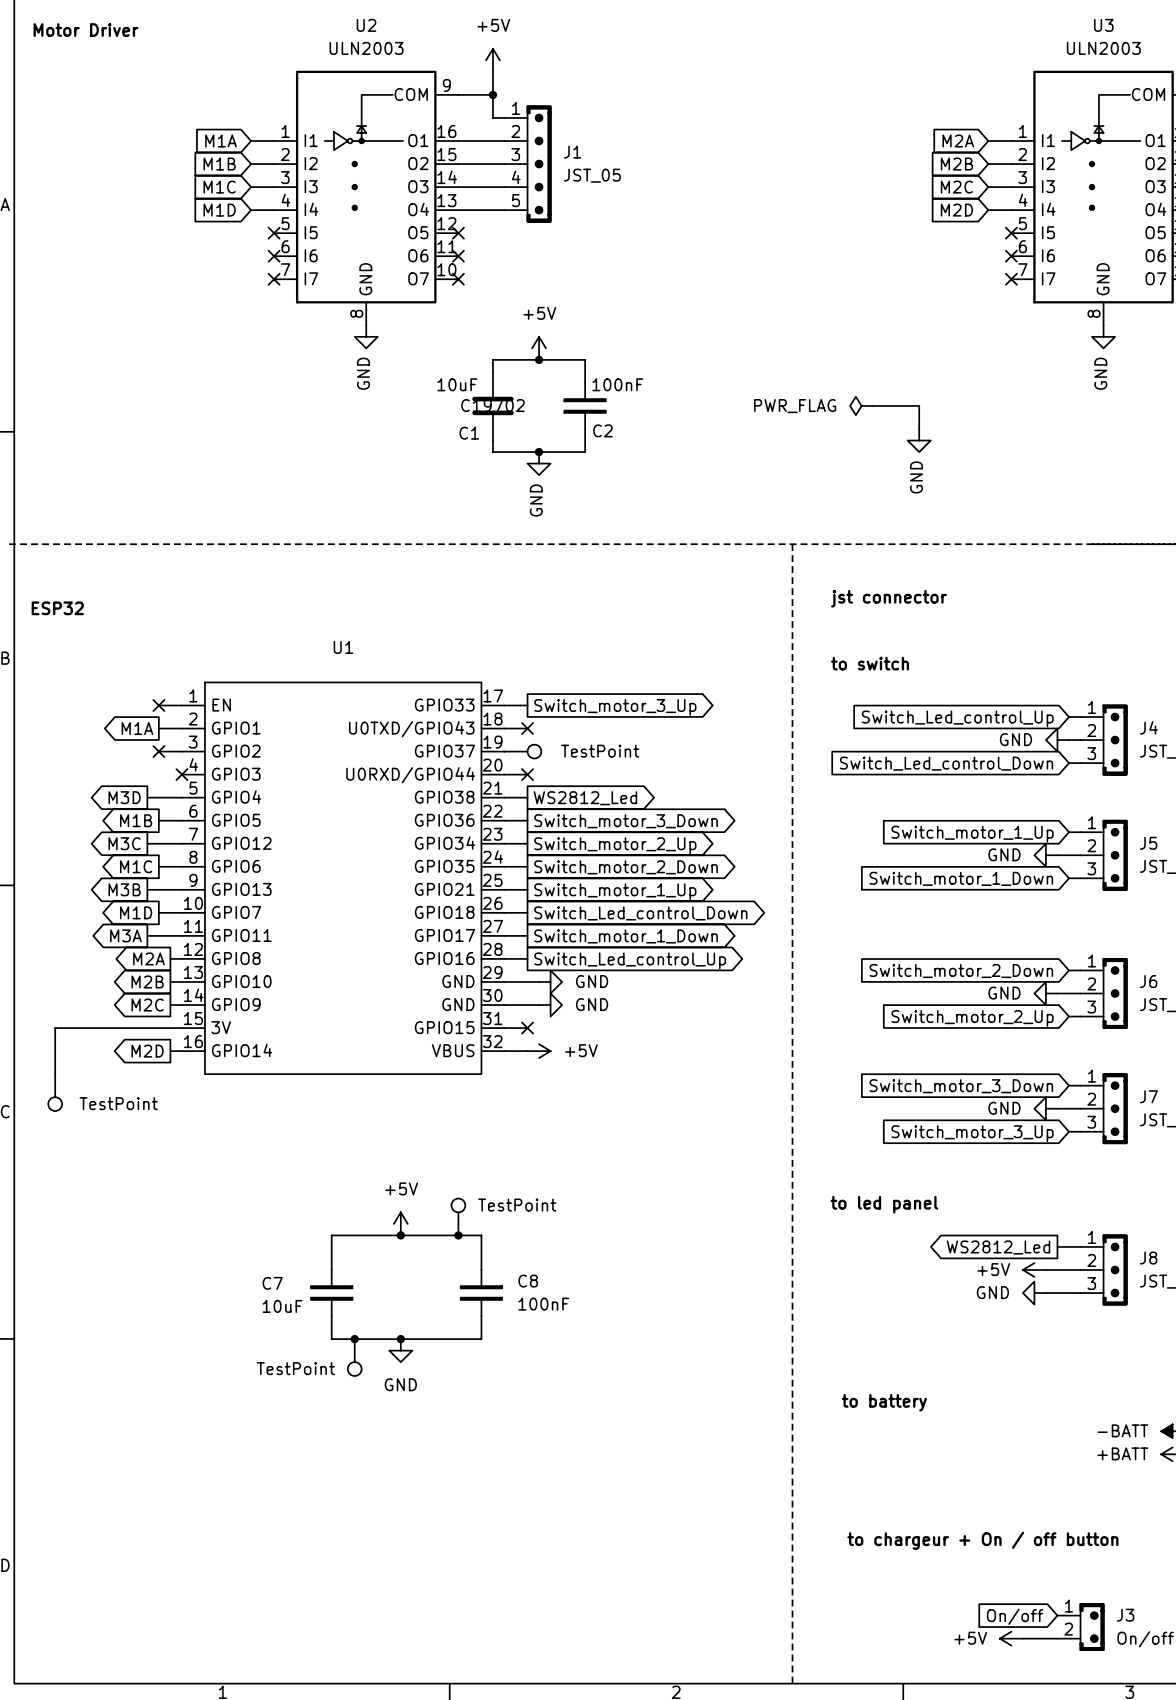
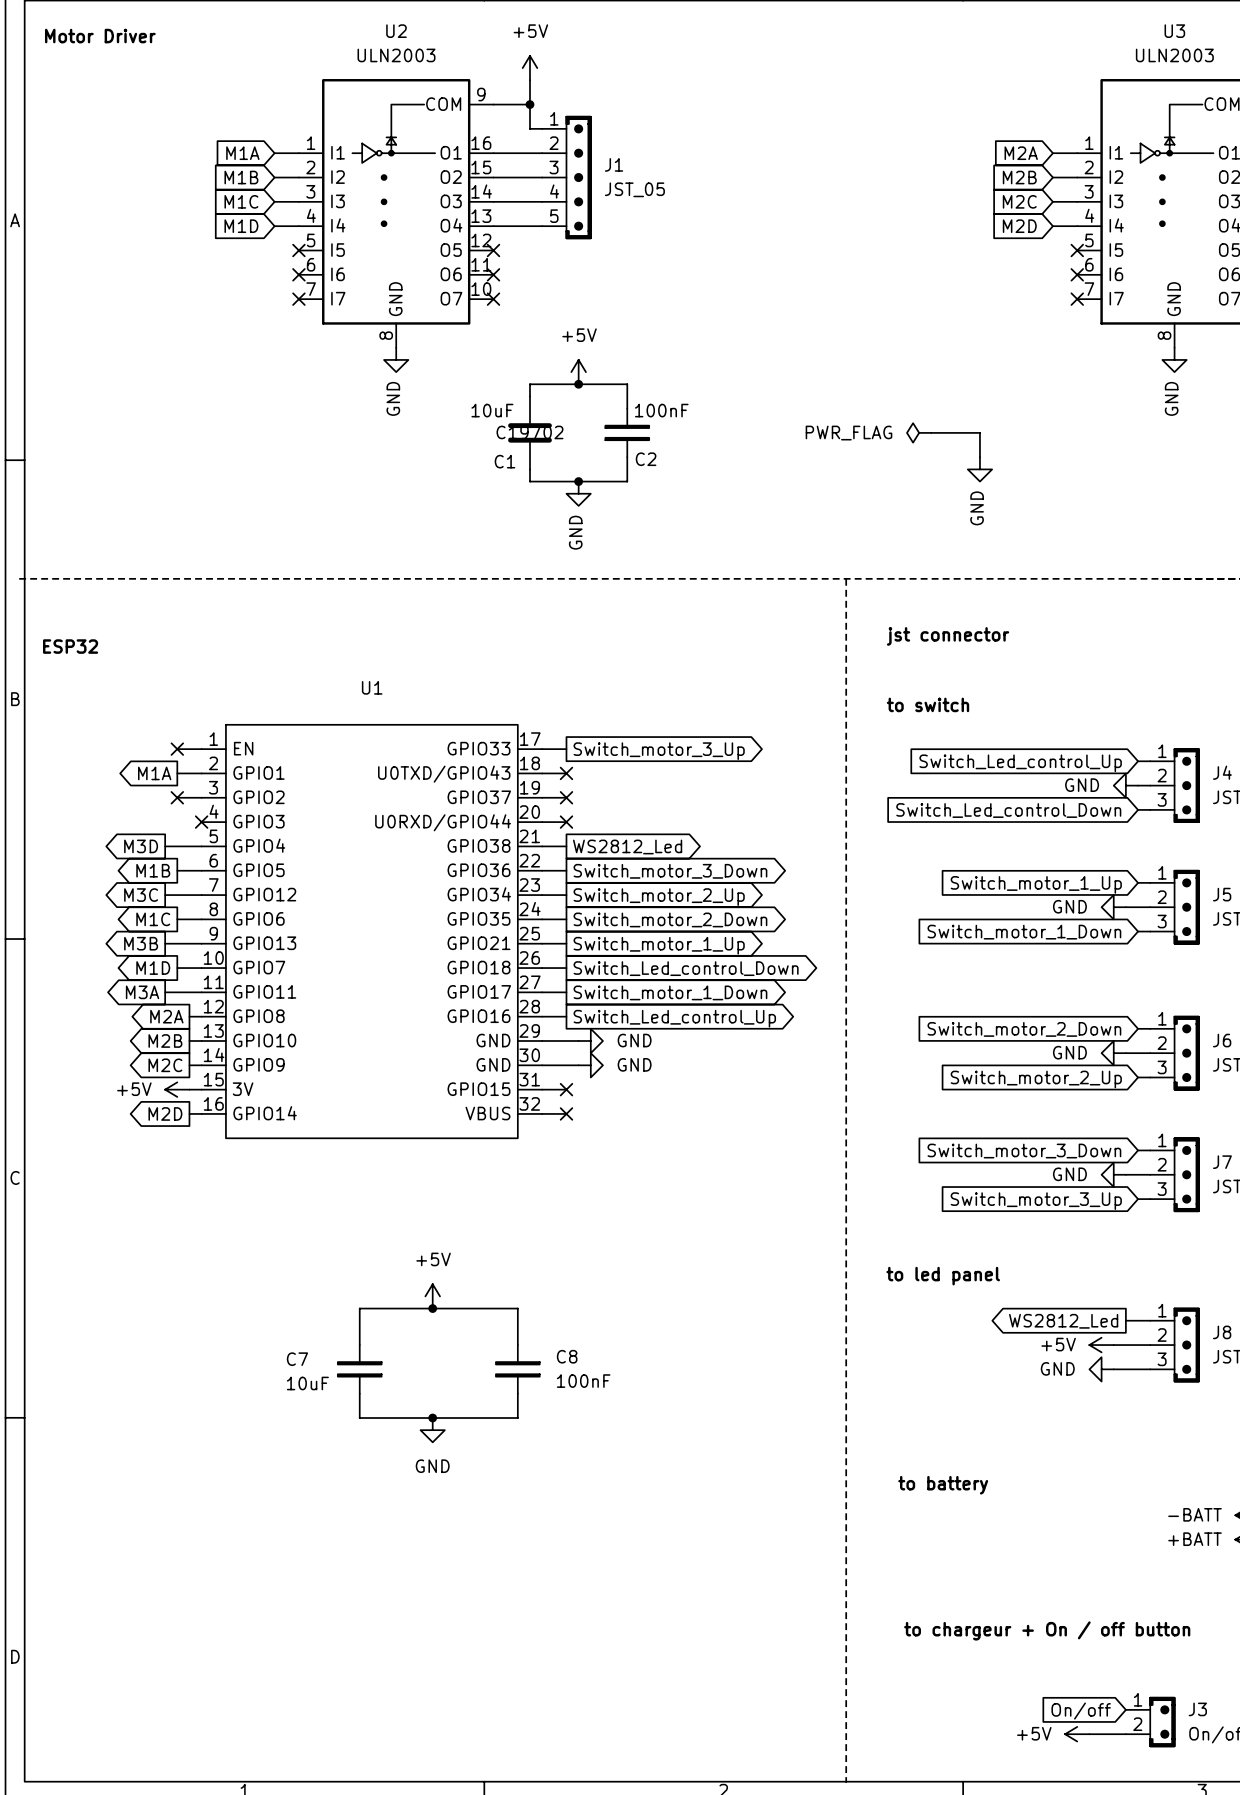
part: TestPoint (522, 751) -> none
no-connect mark: none -> (566, 797)
power symbol: none -> +5V (177, 1089)
wire: (170, 1028) (55, 1028) (55, 1074) -> none
no-connect mark: none -> (566, 1113)
power symbol: +5V (539, 1051) -> none
part: TestPoint (55, 1092) -> none
part: TestPoint (458, 1216) -> none
junction: (458, 1235) -> none
junction: (354, 1339) -> none
part: TestPoint (354, 1357) -> none

